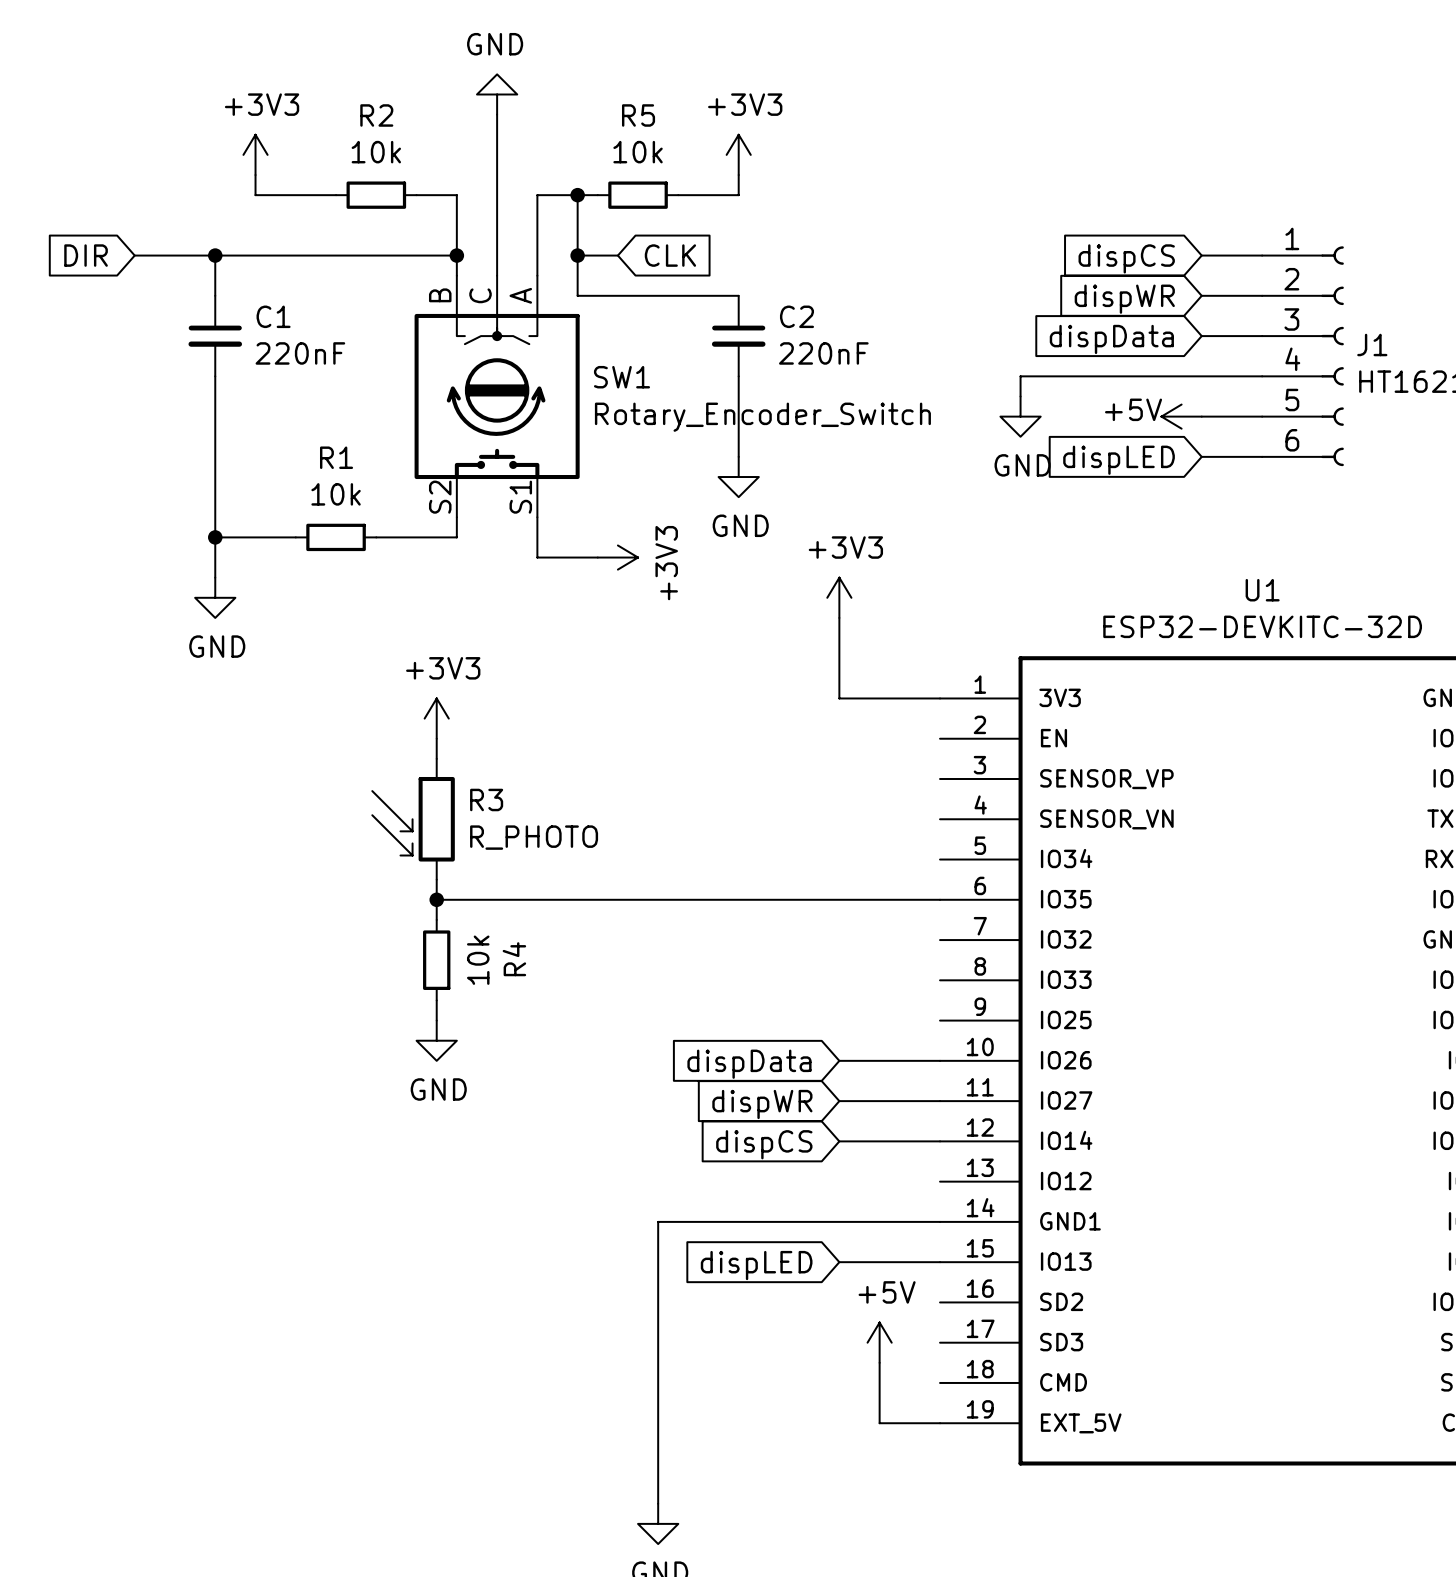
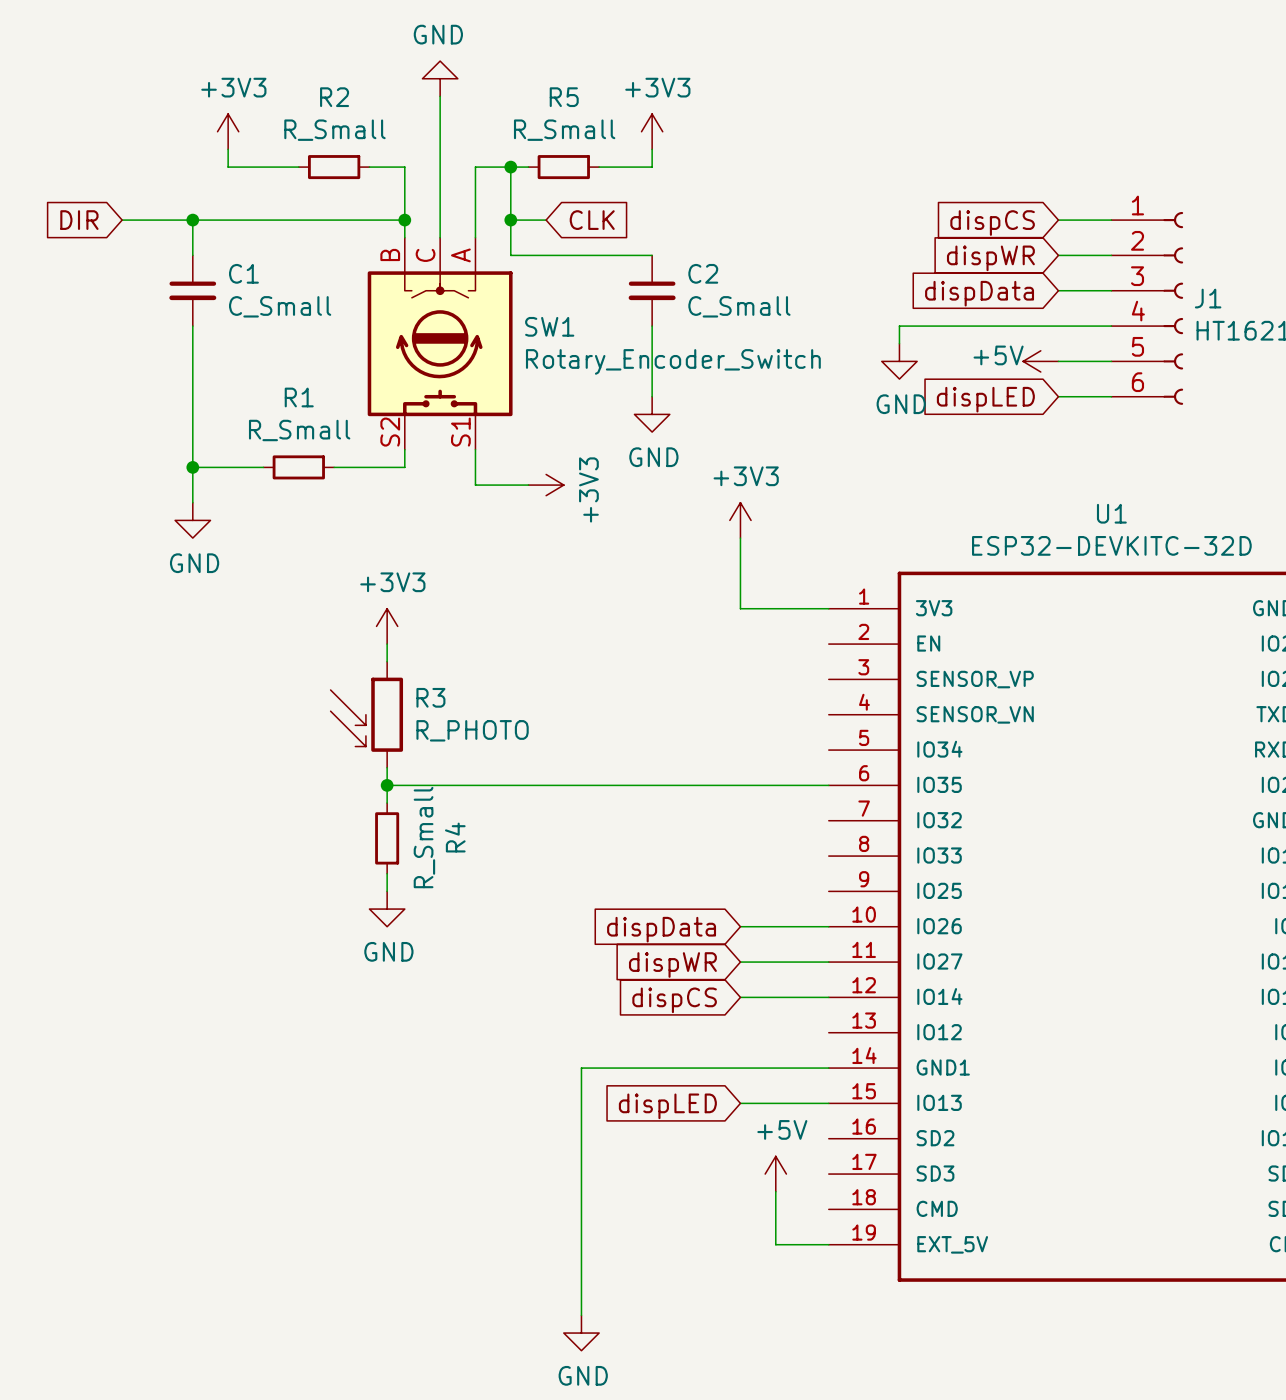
R2 value: 10k (376, 152) -> R_Small (334, 130)
R5 value: 10k (638, 152) -> R_Small (564, 130)
C1 value: 220nF (300, 353) -> C_Small (280, 306)
C2 value: 220nF (823, 353) -> C_Small (739, 306)
R1 value: 10k (336, 494) -> R_Small (299, 430)
R4 value: 10k (478, 960) -> R_Small (424, 837)

